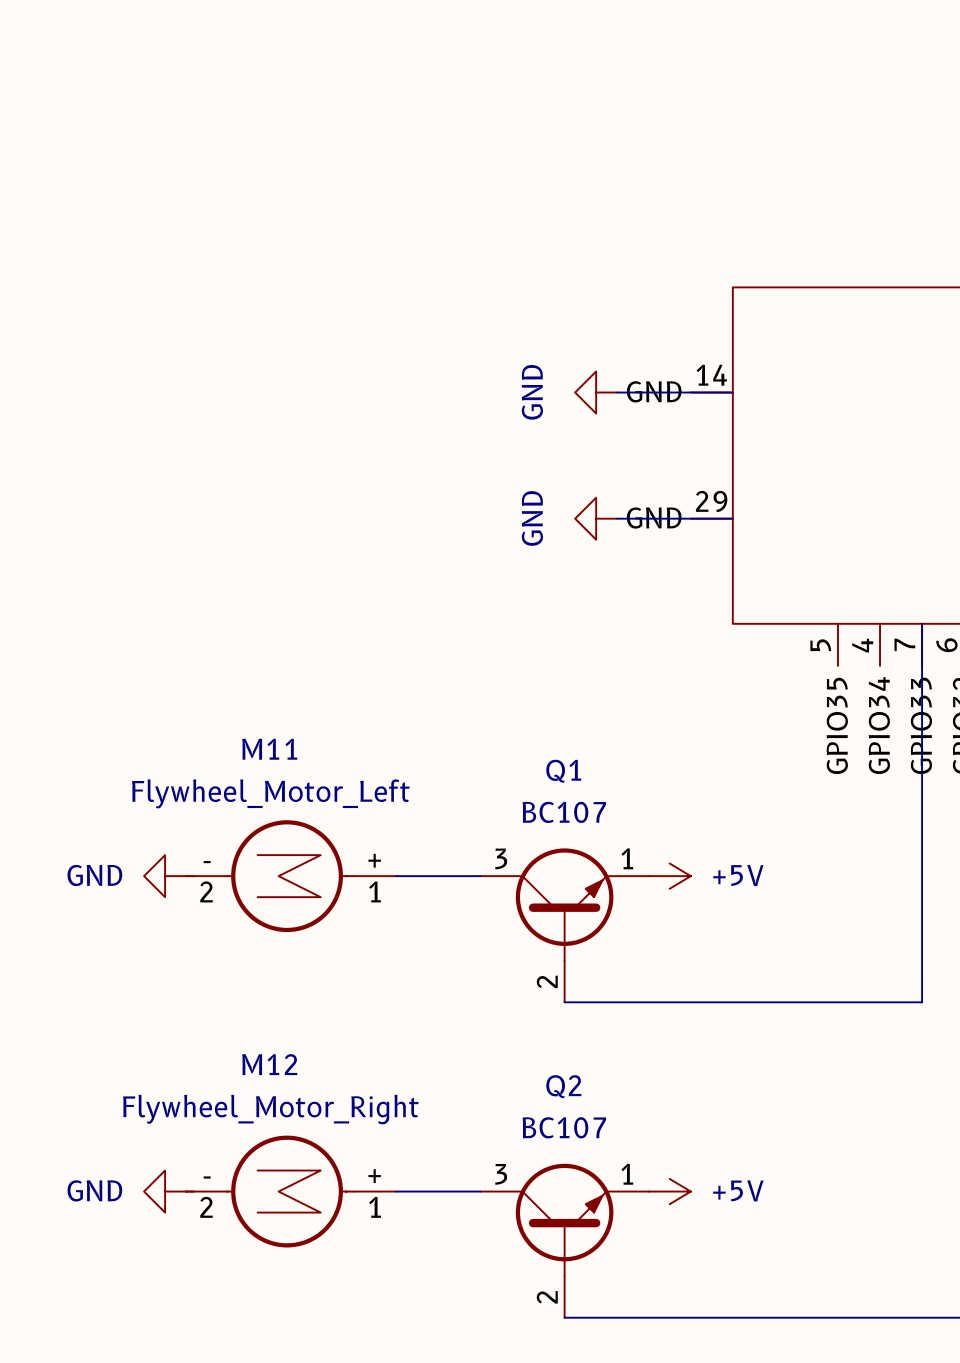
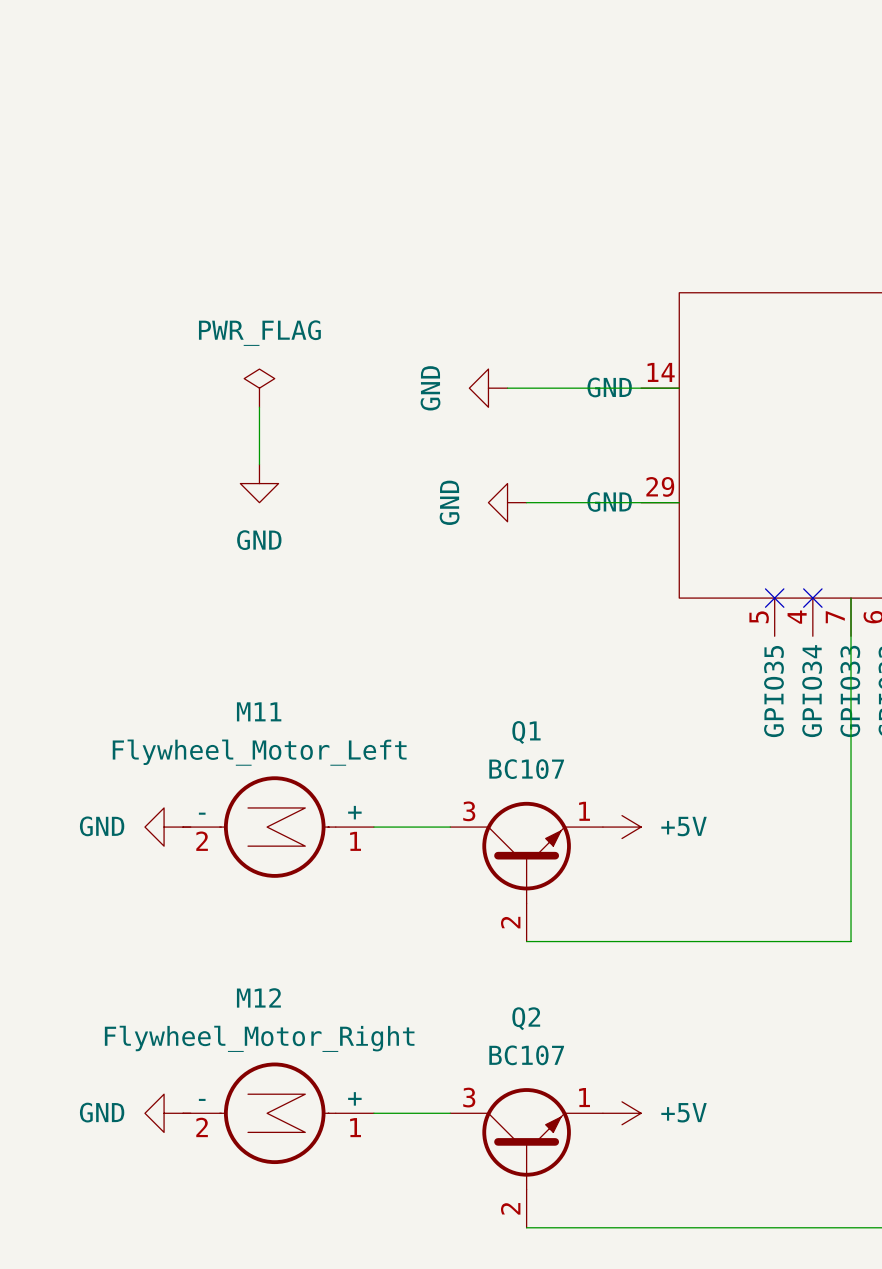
power symbol: none -> PWR_FLAG (259, 388)
power symbol: none -> GND (488, 388)
wire: none -> (507, 388) (574, 388)
power symbol: GND (596, 392) -> none
wire: none -> (259, 407) (259, 464)
power symbol: none -> GND (259, 483)
wire: none -> (526, 502) (574, 502)
power symbol position: GND (596, 518) -> GND (507, 502)
no-connect mark: none -> (774, 598)
no-connect mark: none -> (812, 598)

